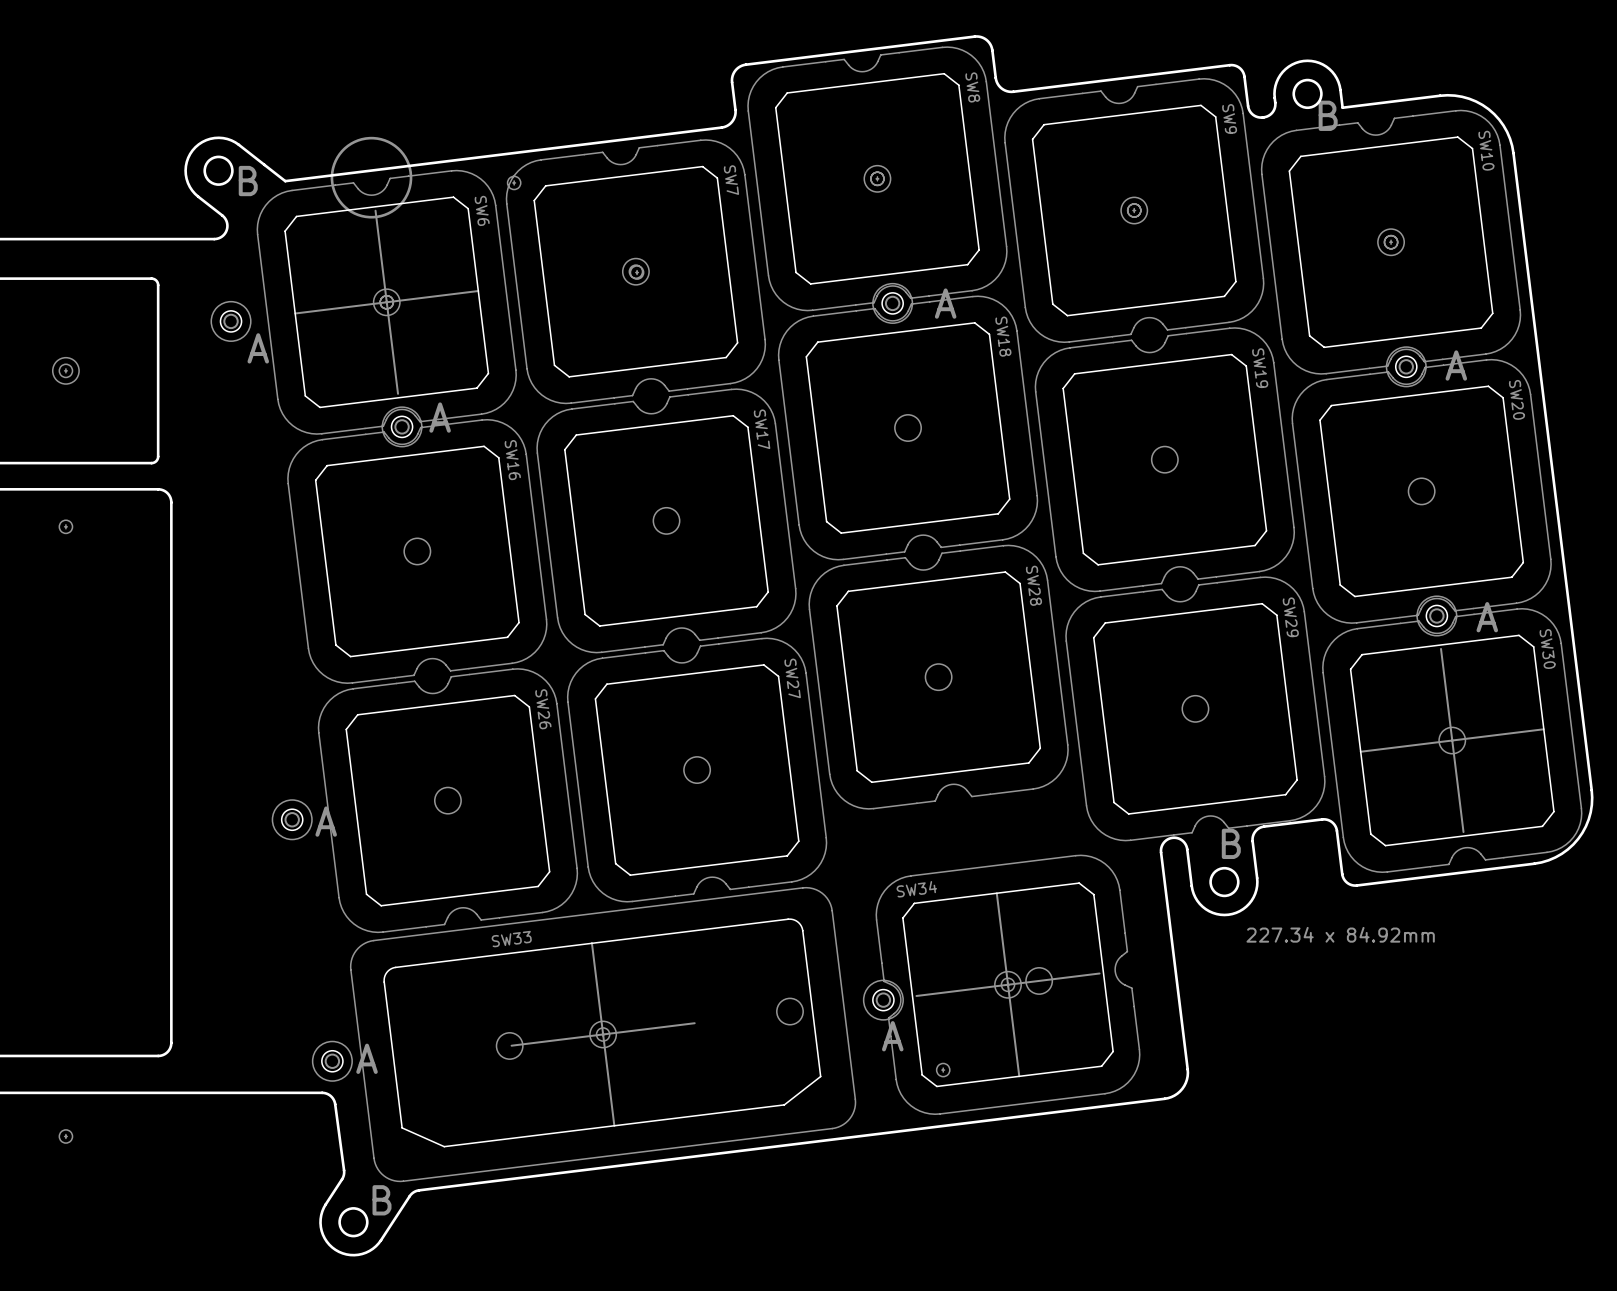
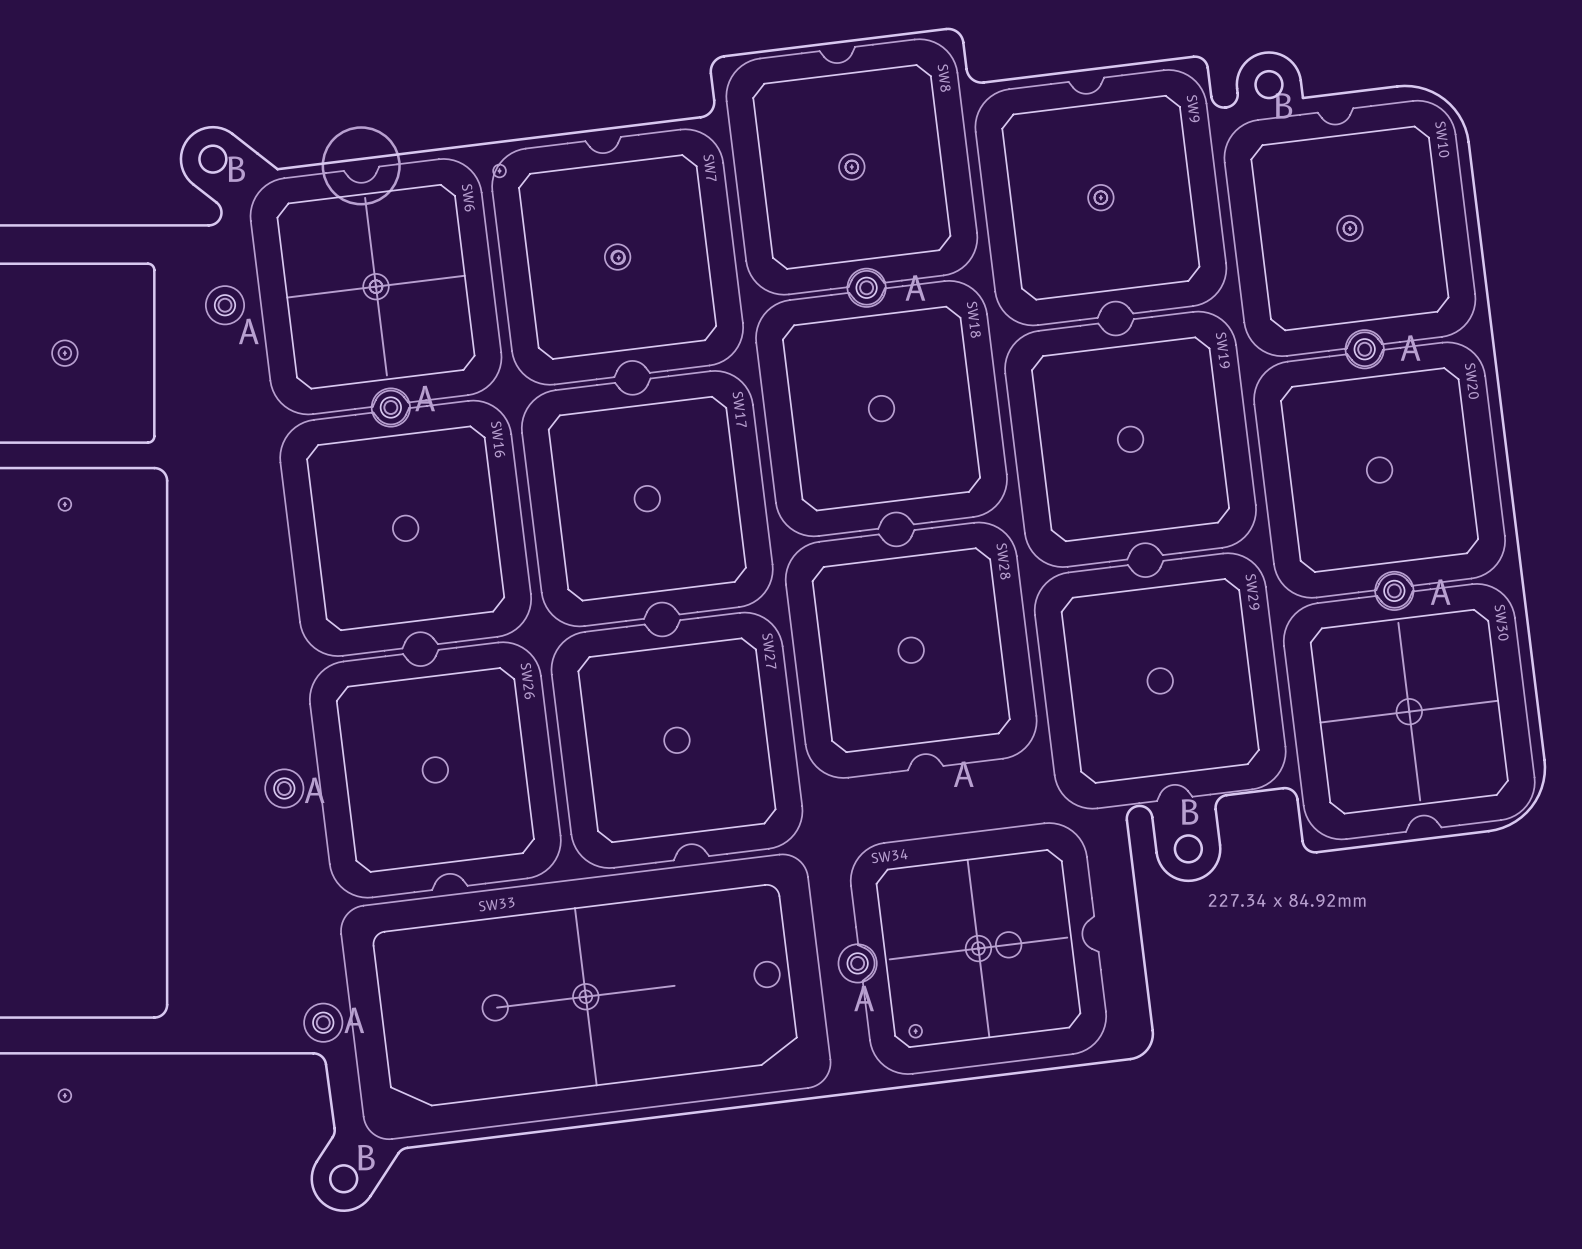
text: none -> A (963, 774)

